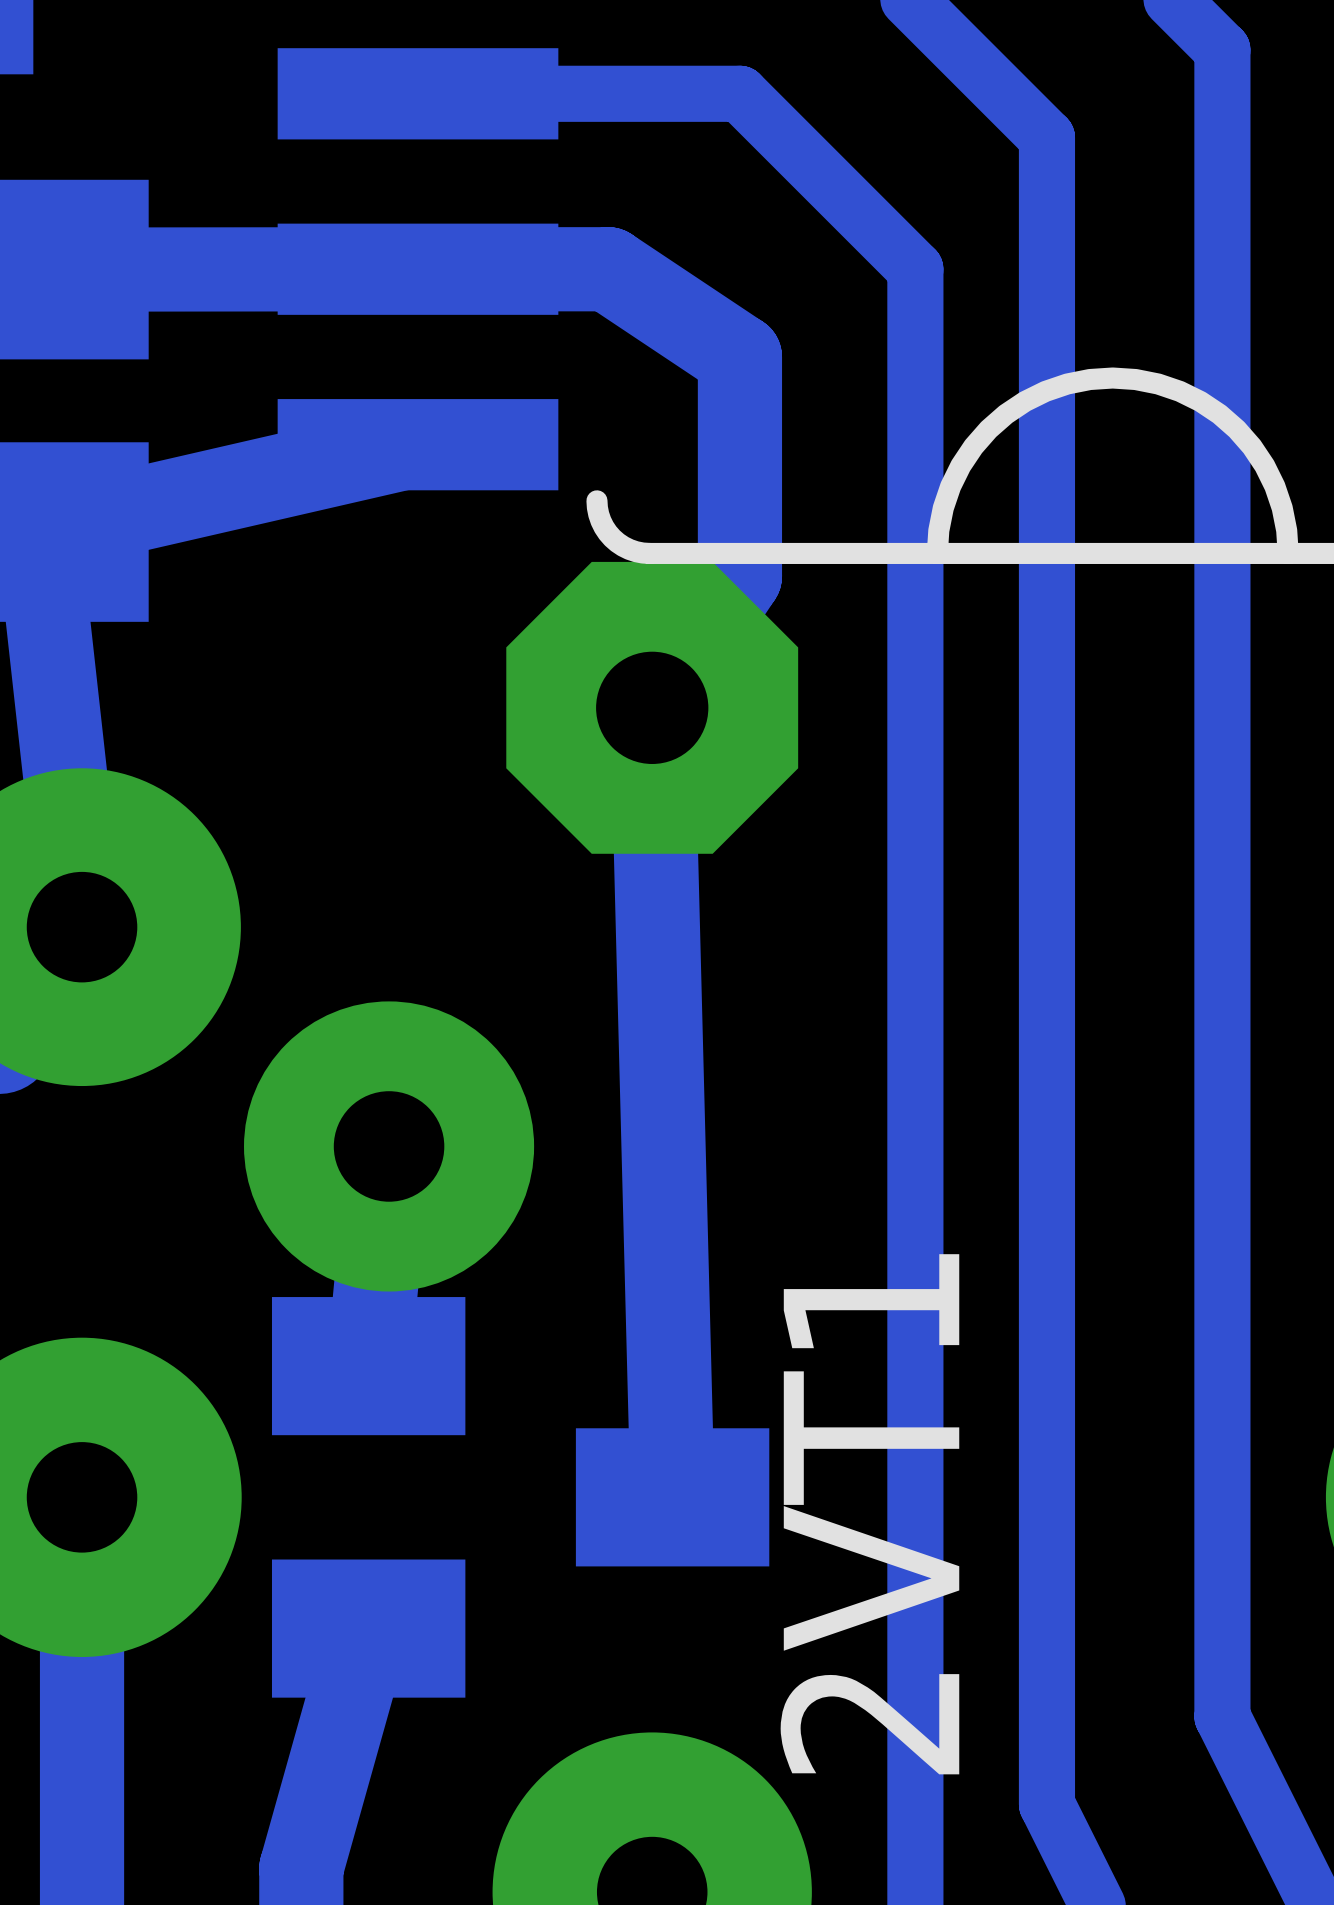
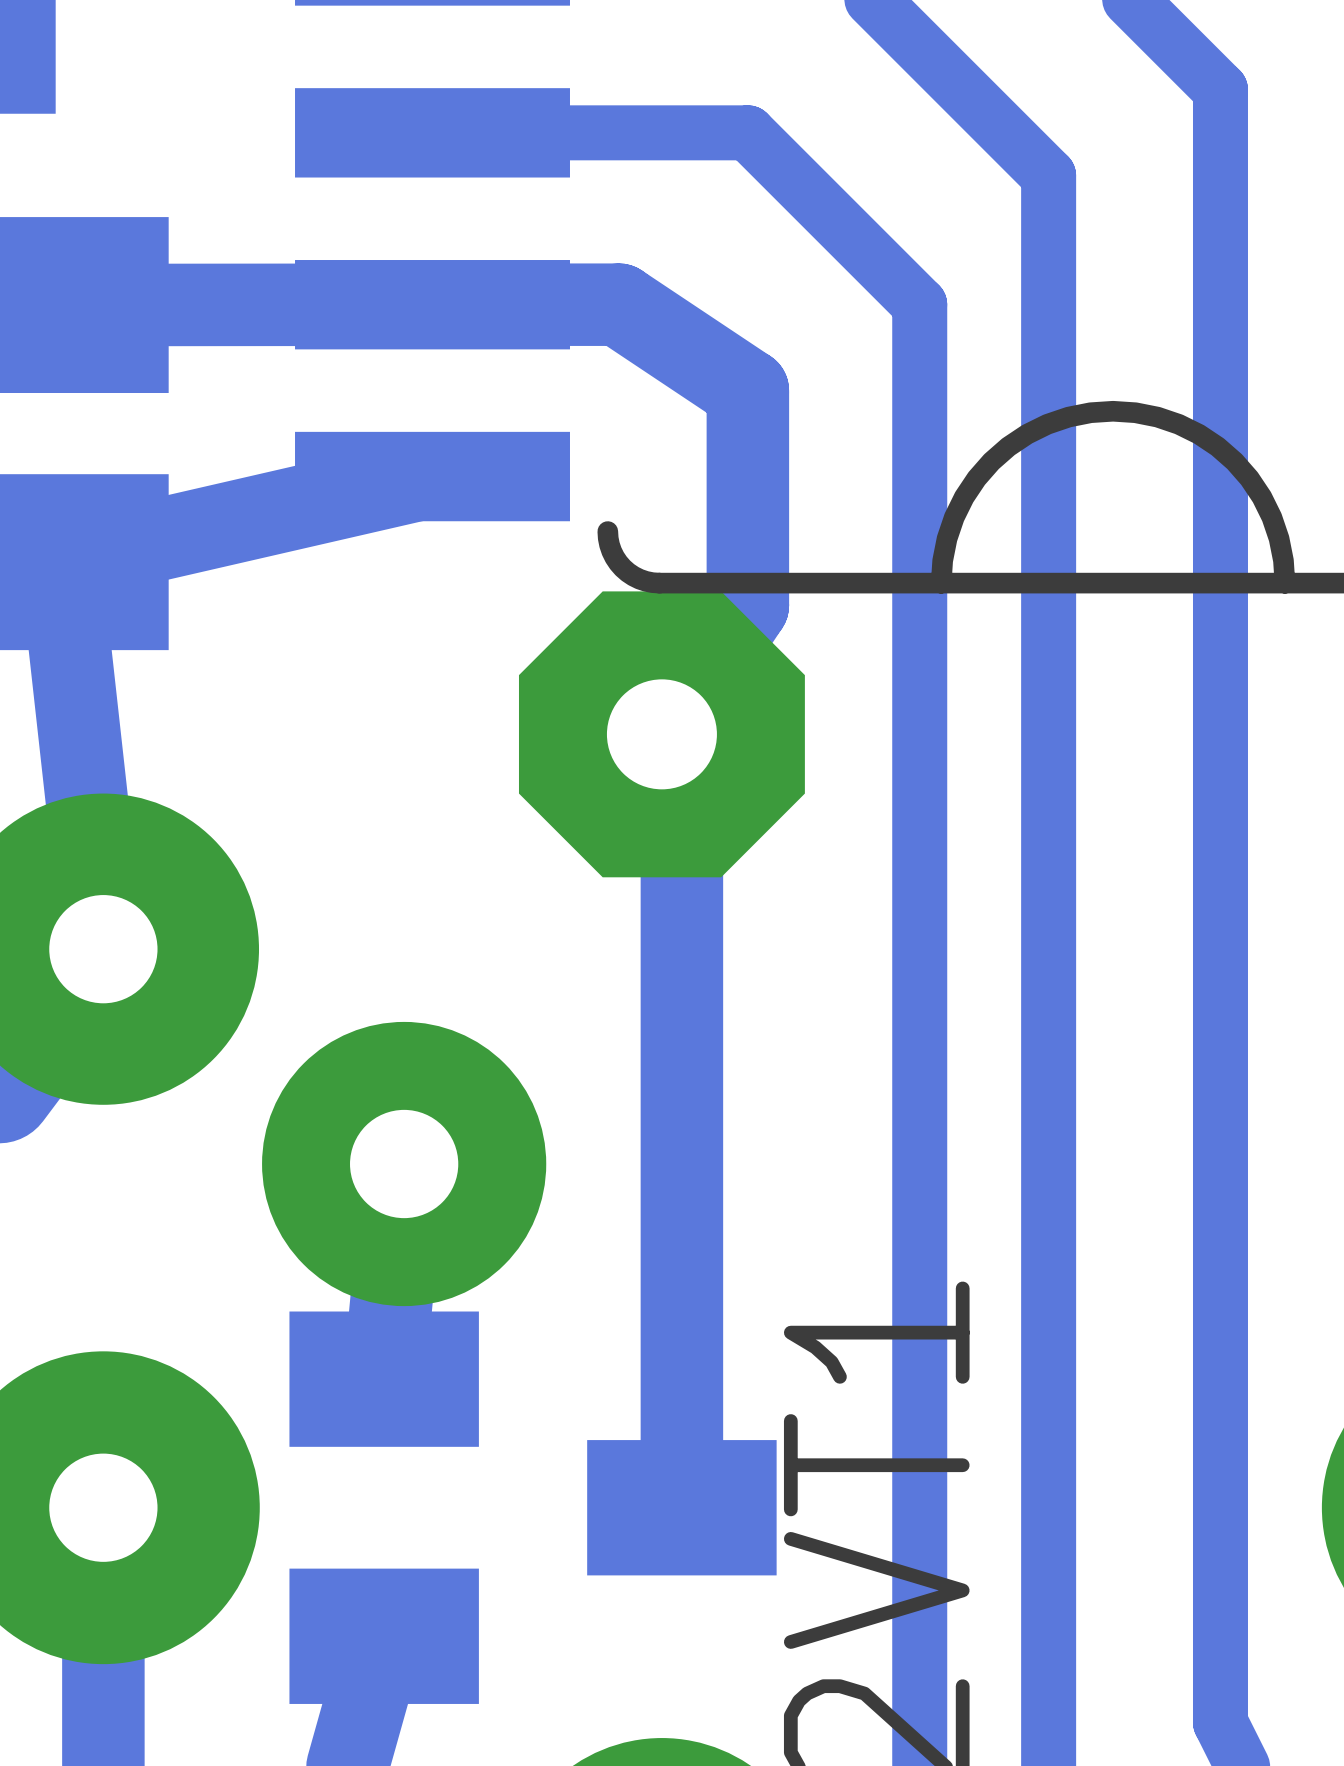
track: (652, 707) (672, 1497) -> (661, 734) (681, 754) (681, 1507)

